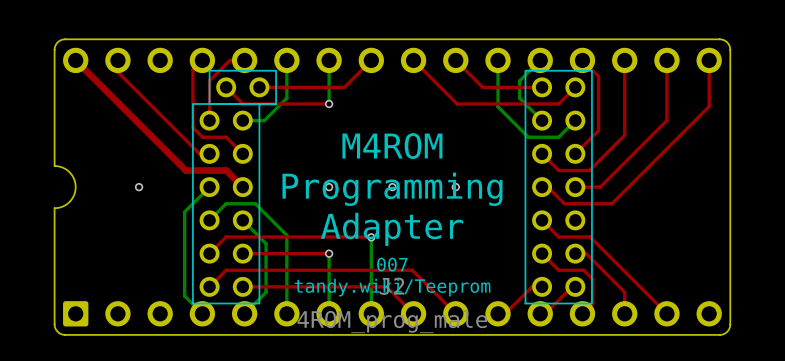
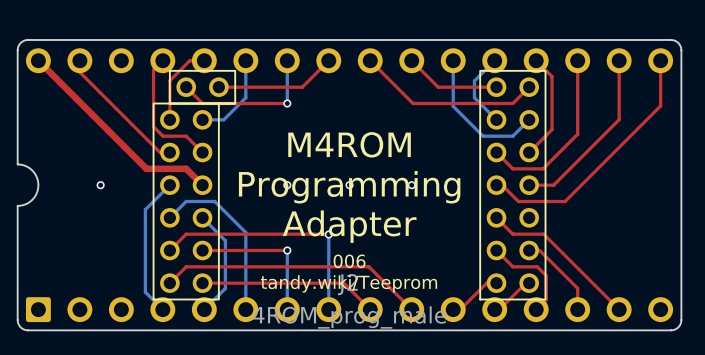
text: 007 (392, 264) -> 006 (349, 261)

